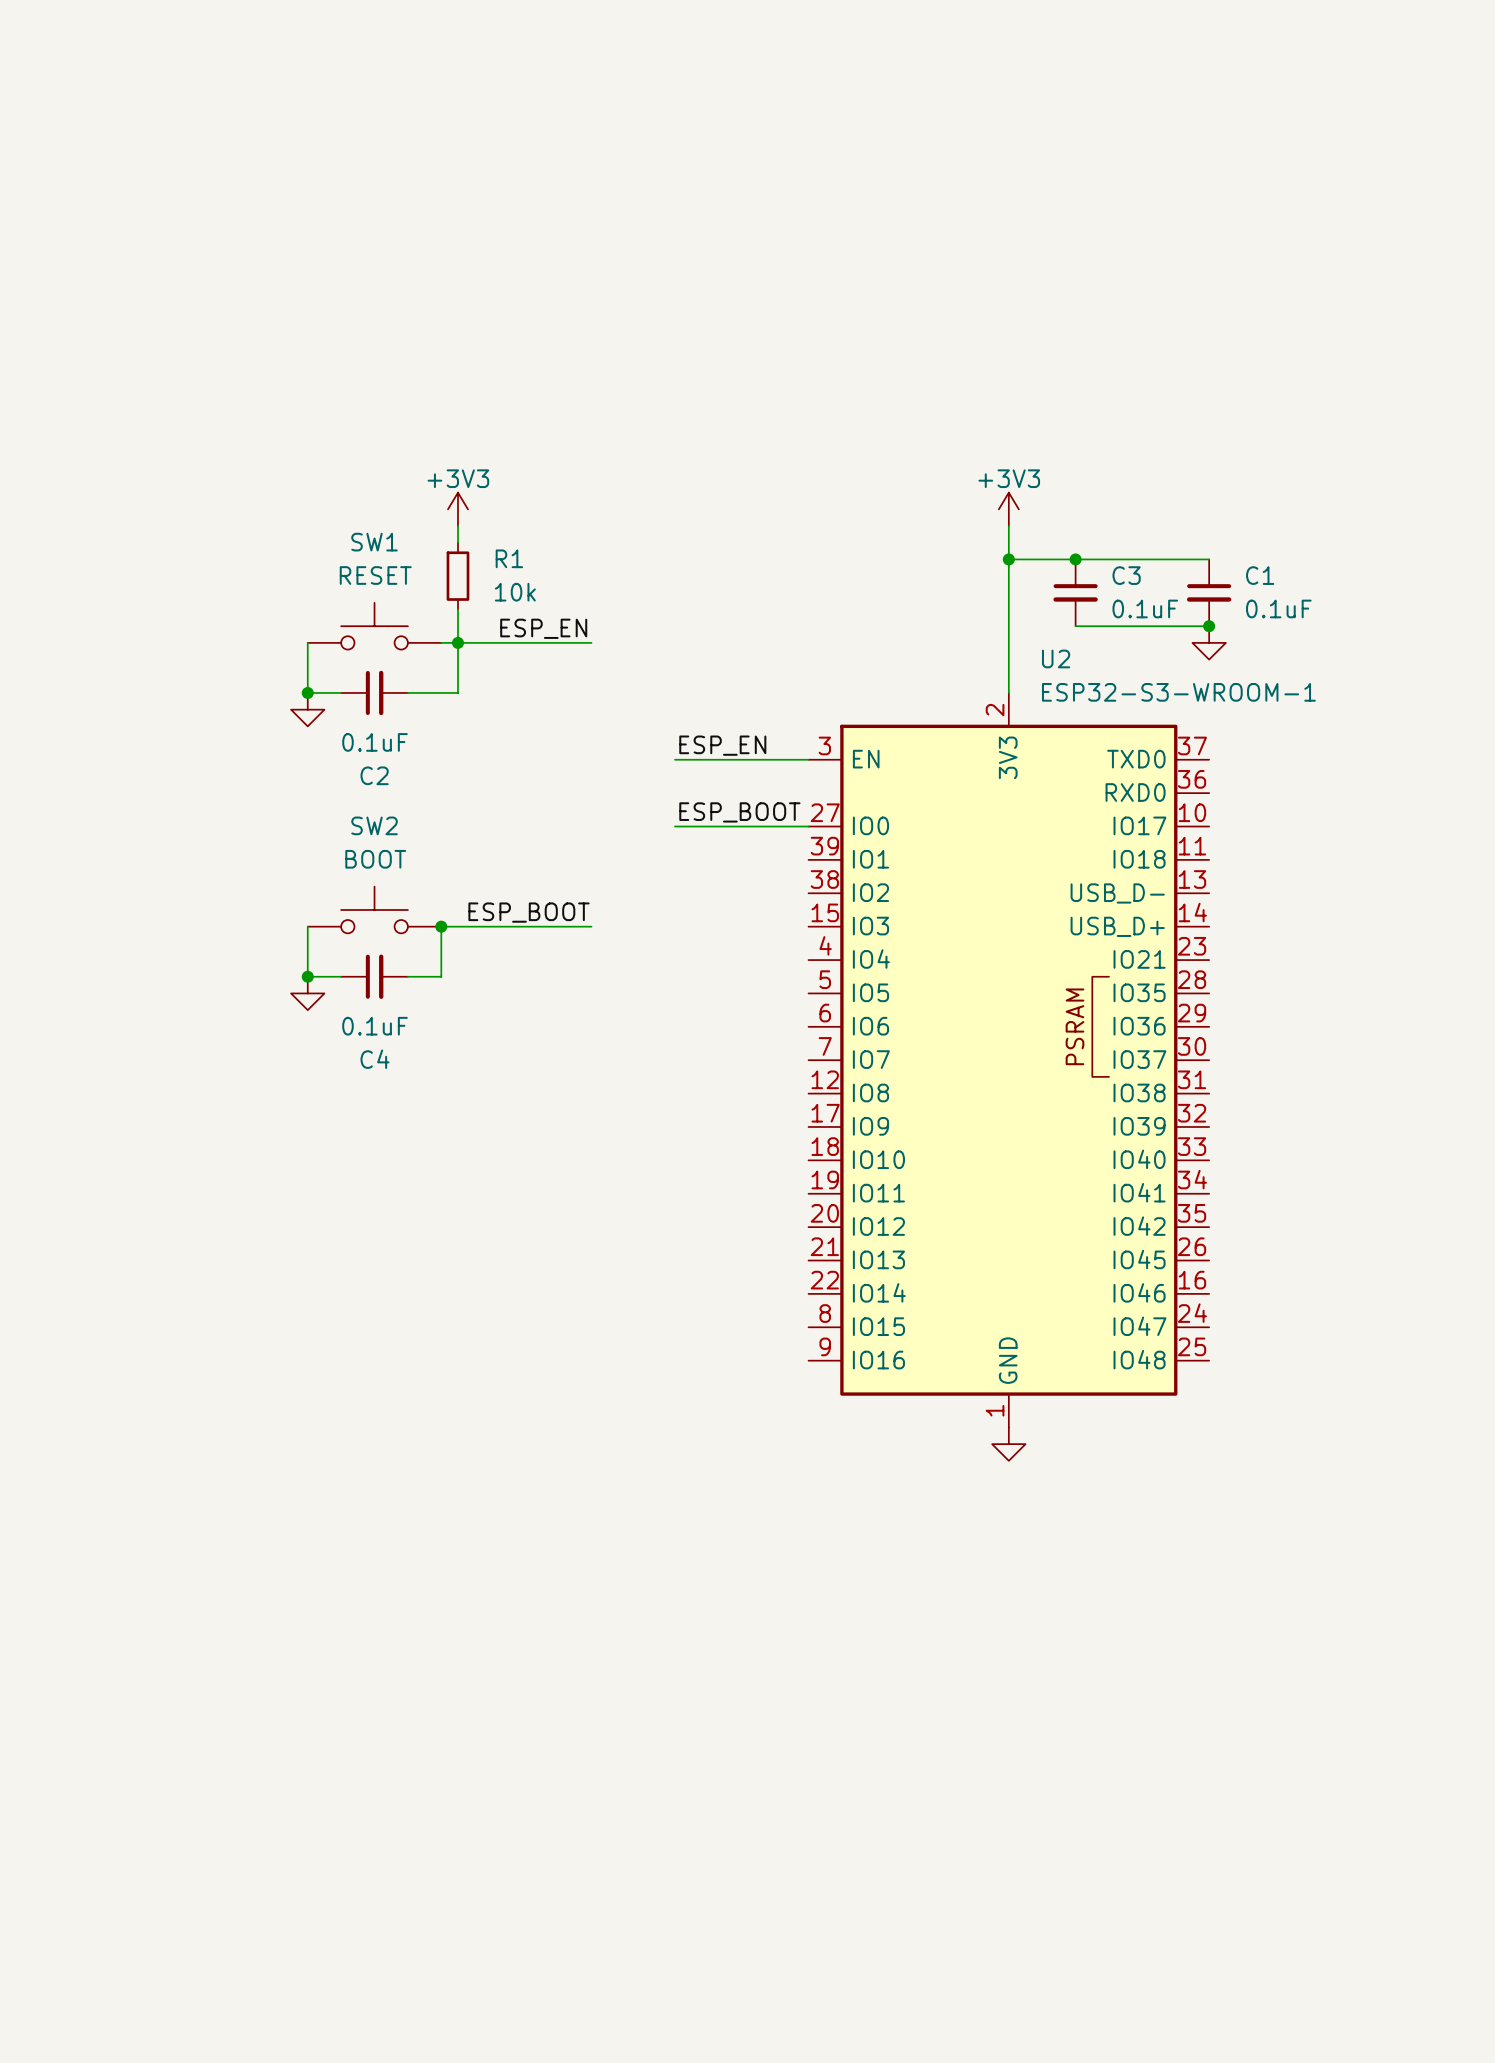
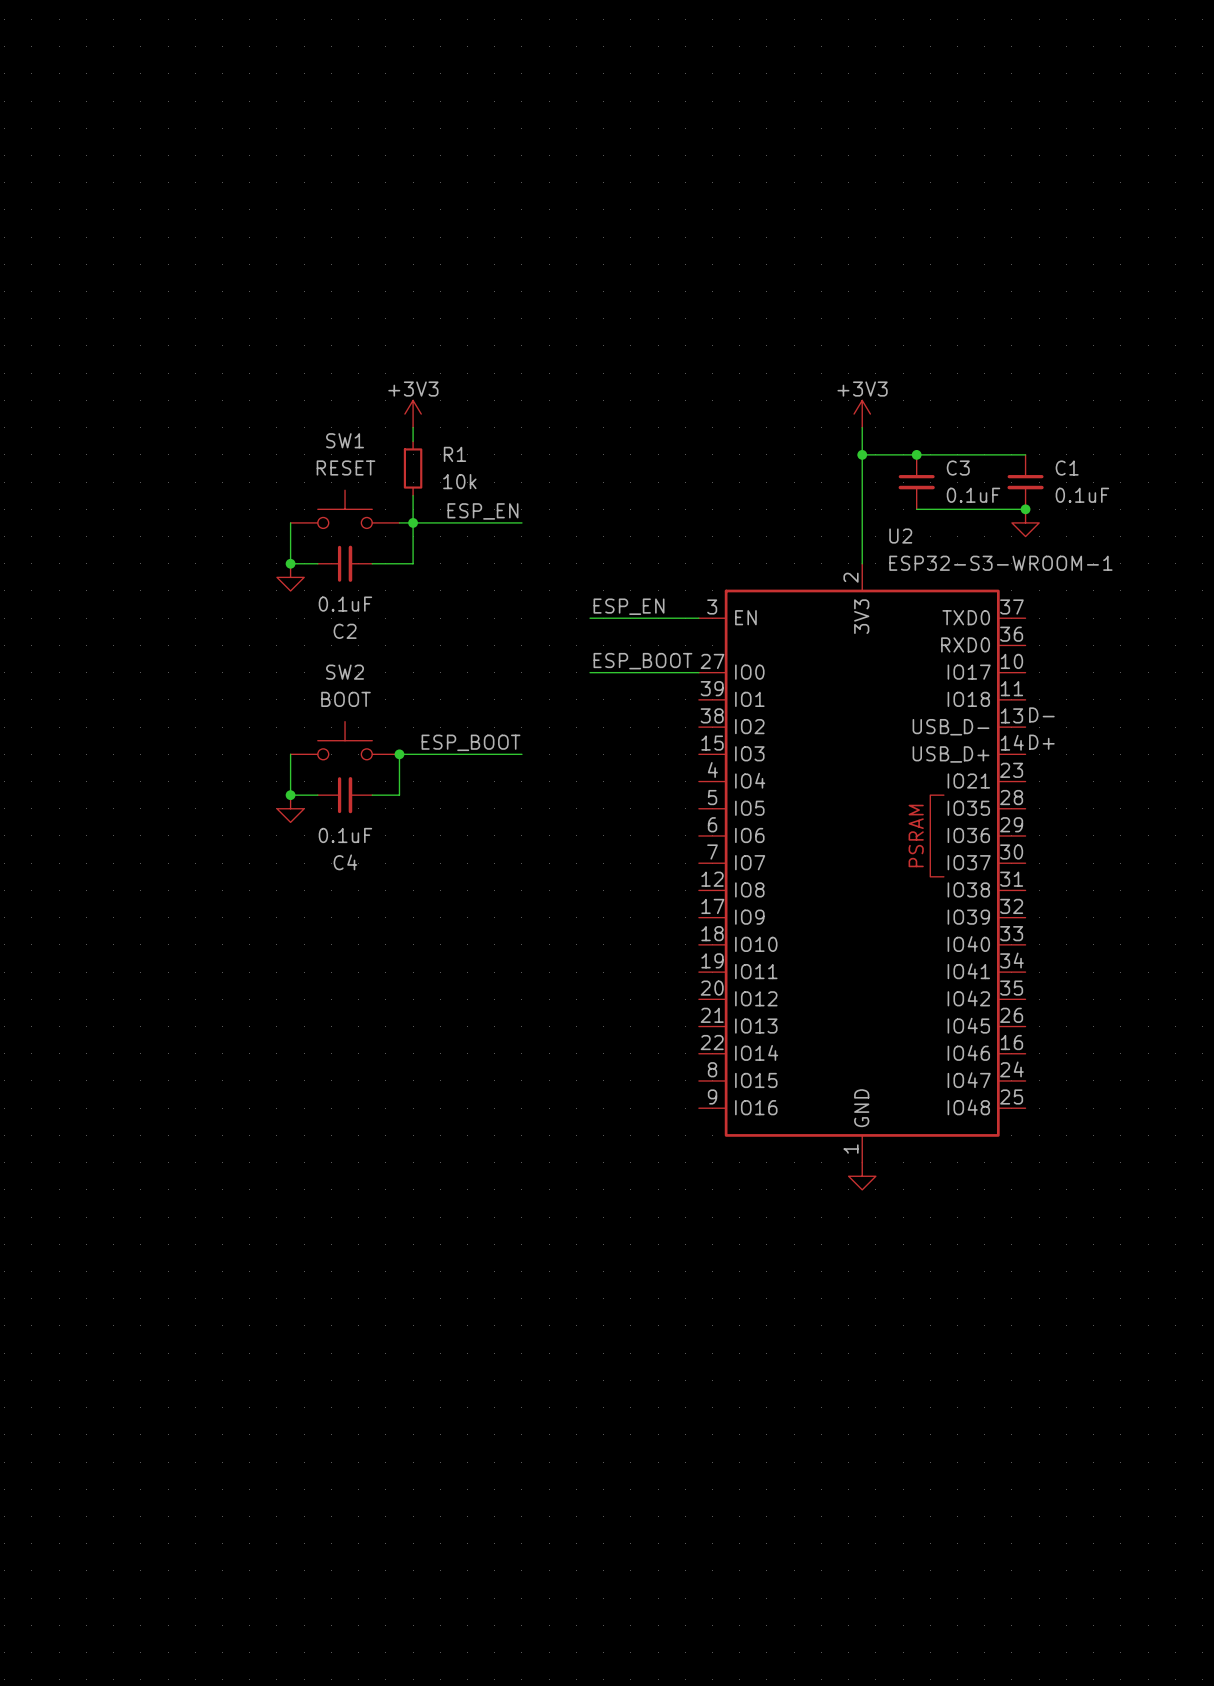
label: none -> D- (1041, 714)
label: none -> D+ (1041, 742)

